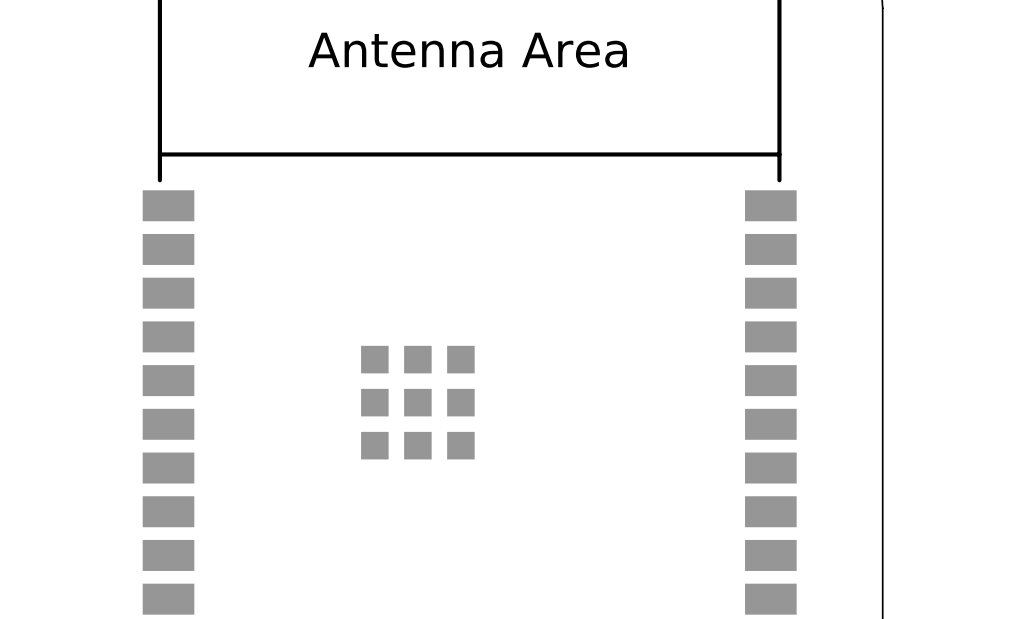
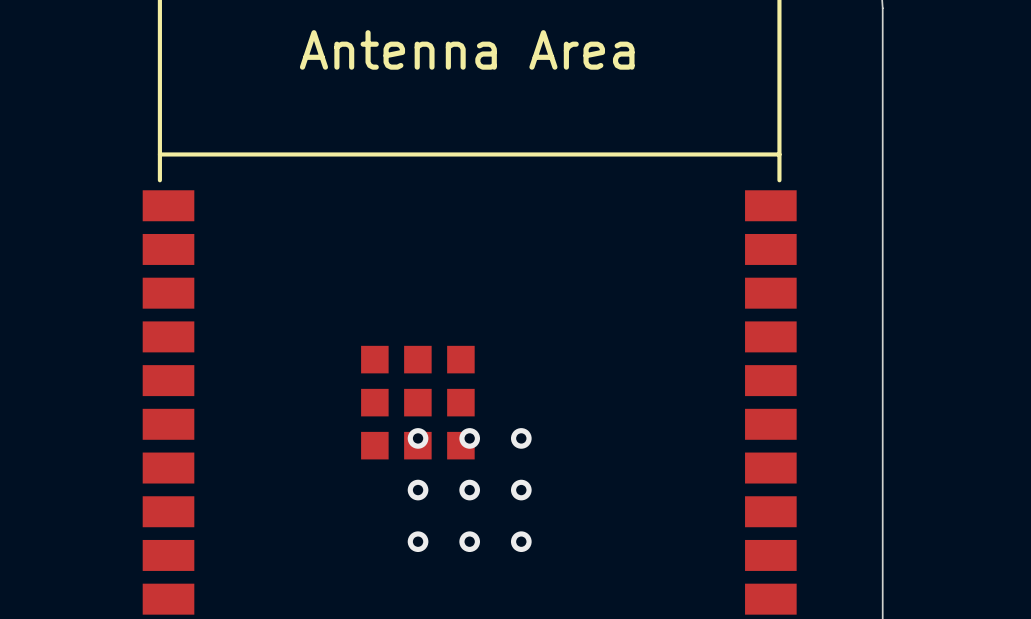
via: none -> (418, 438)
via: none -> (469, 438)
via: none -> (521, 438)
via: none -> (418, 490)
via: none -> (469, 490)
via: none -> (521, 490)
via: none -> (418, 541)
via: none -> (469, 541)
via: none -> (521, 541)

